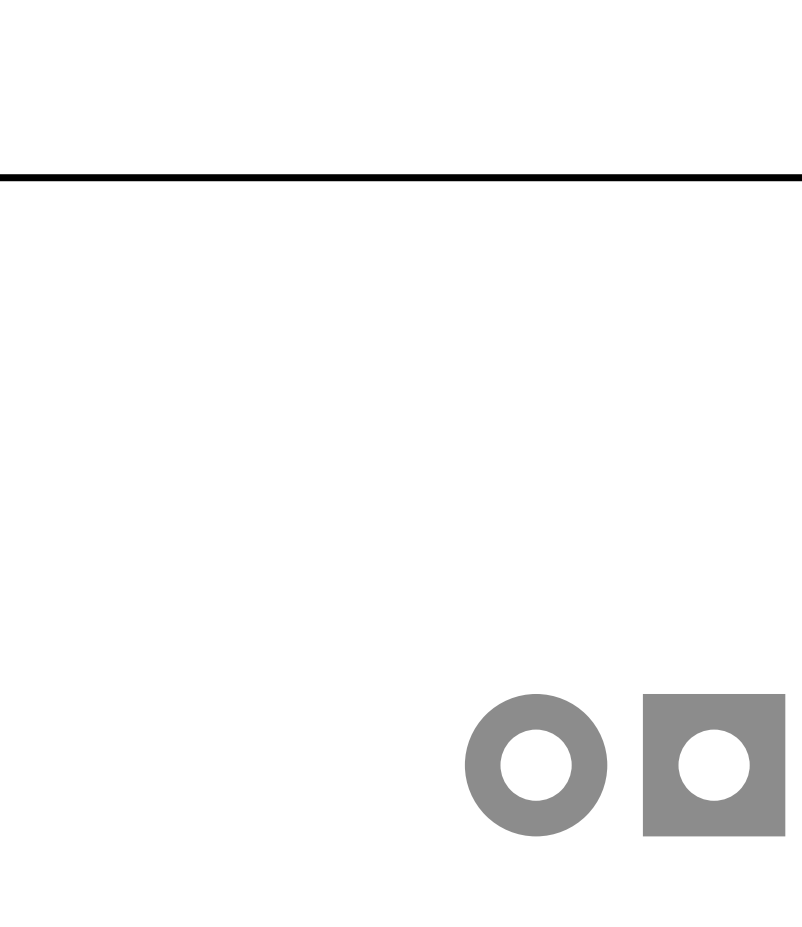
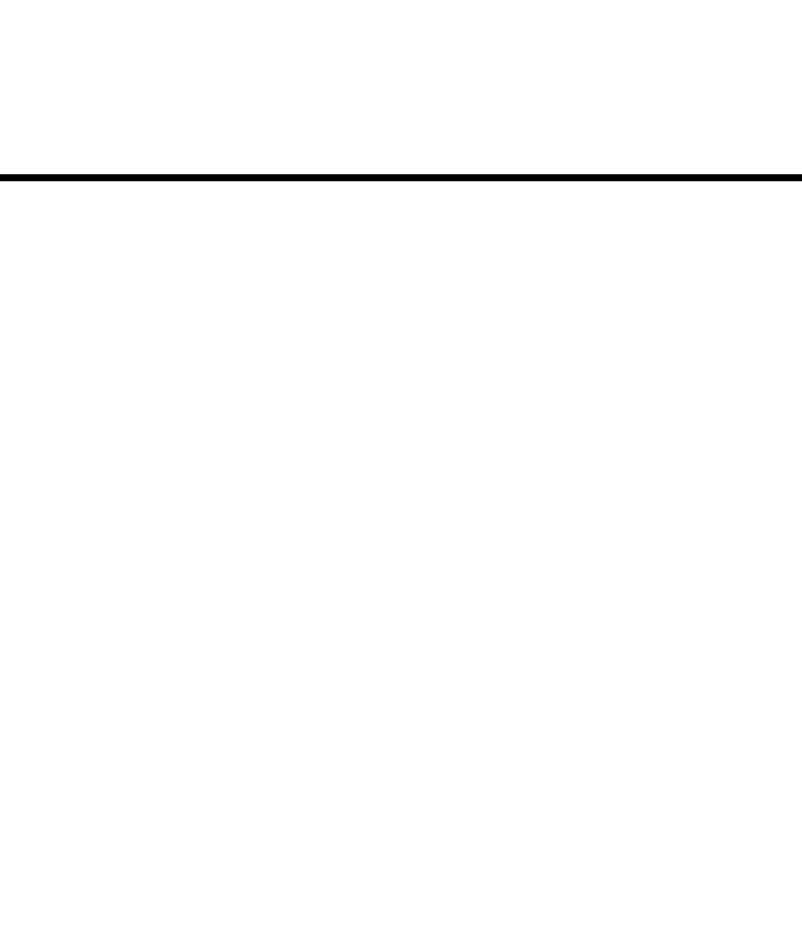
part: (625, 765) -> none

